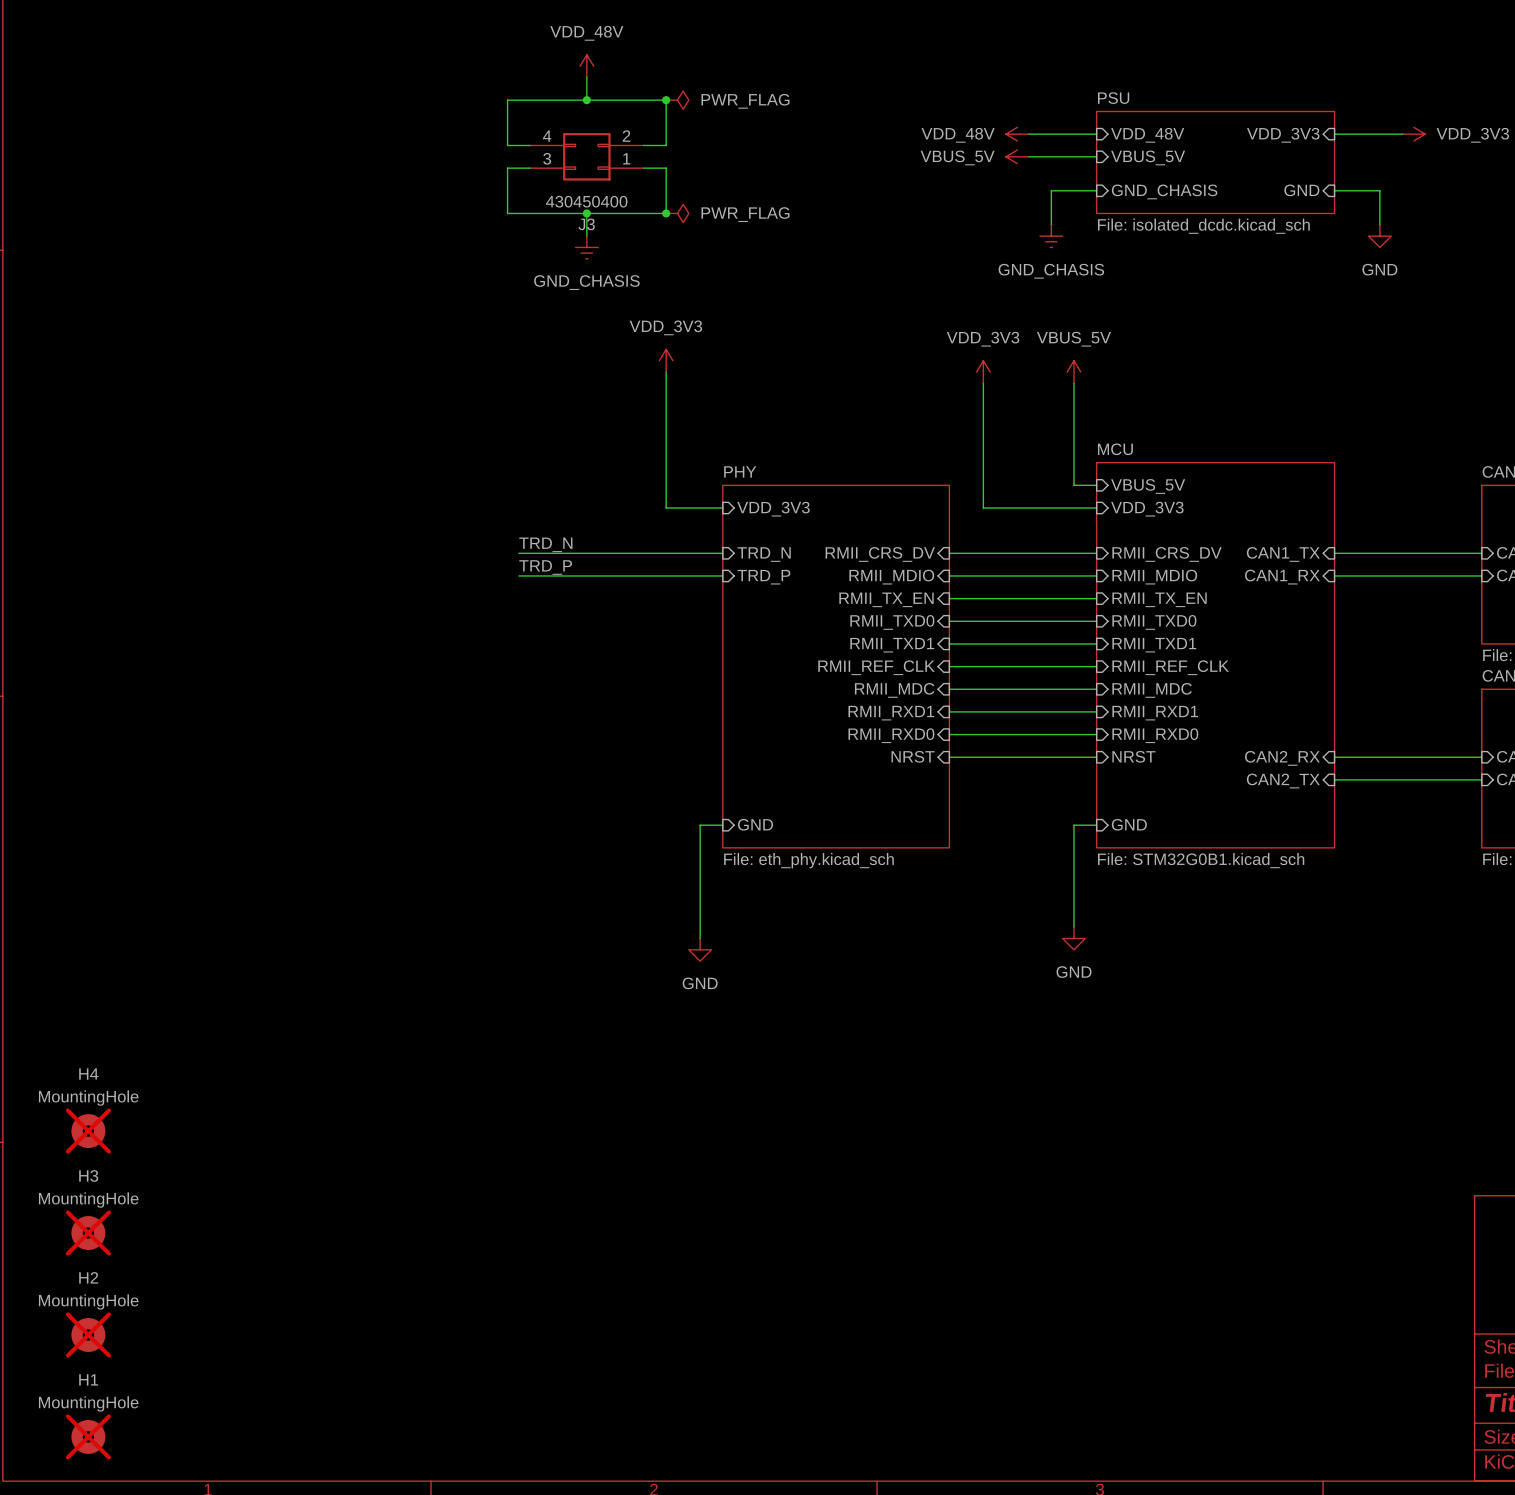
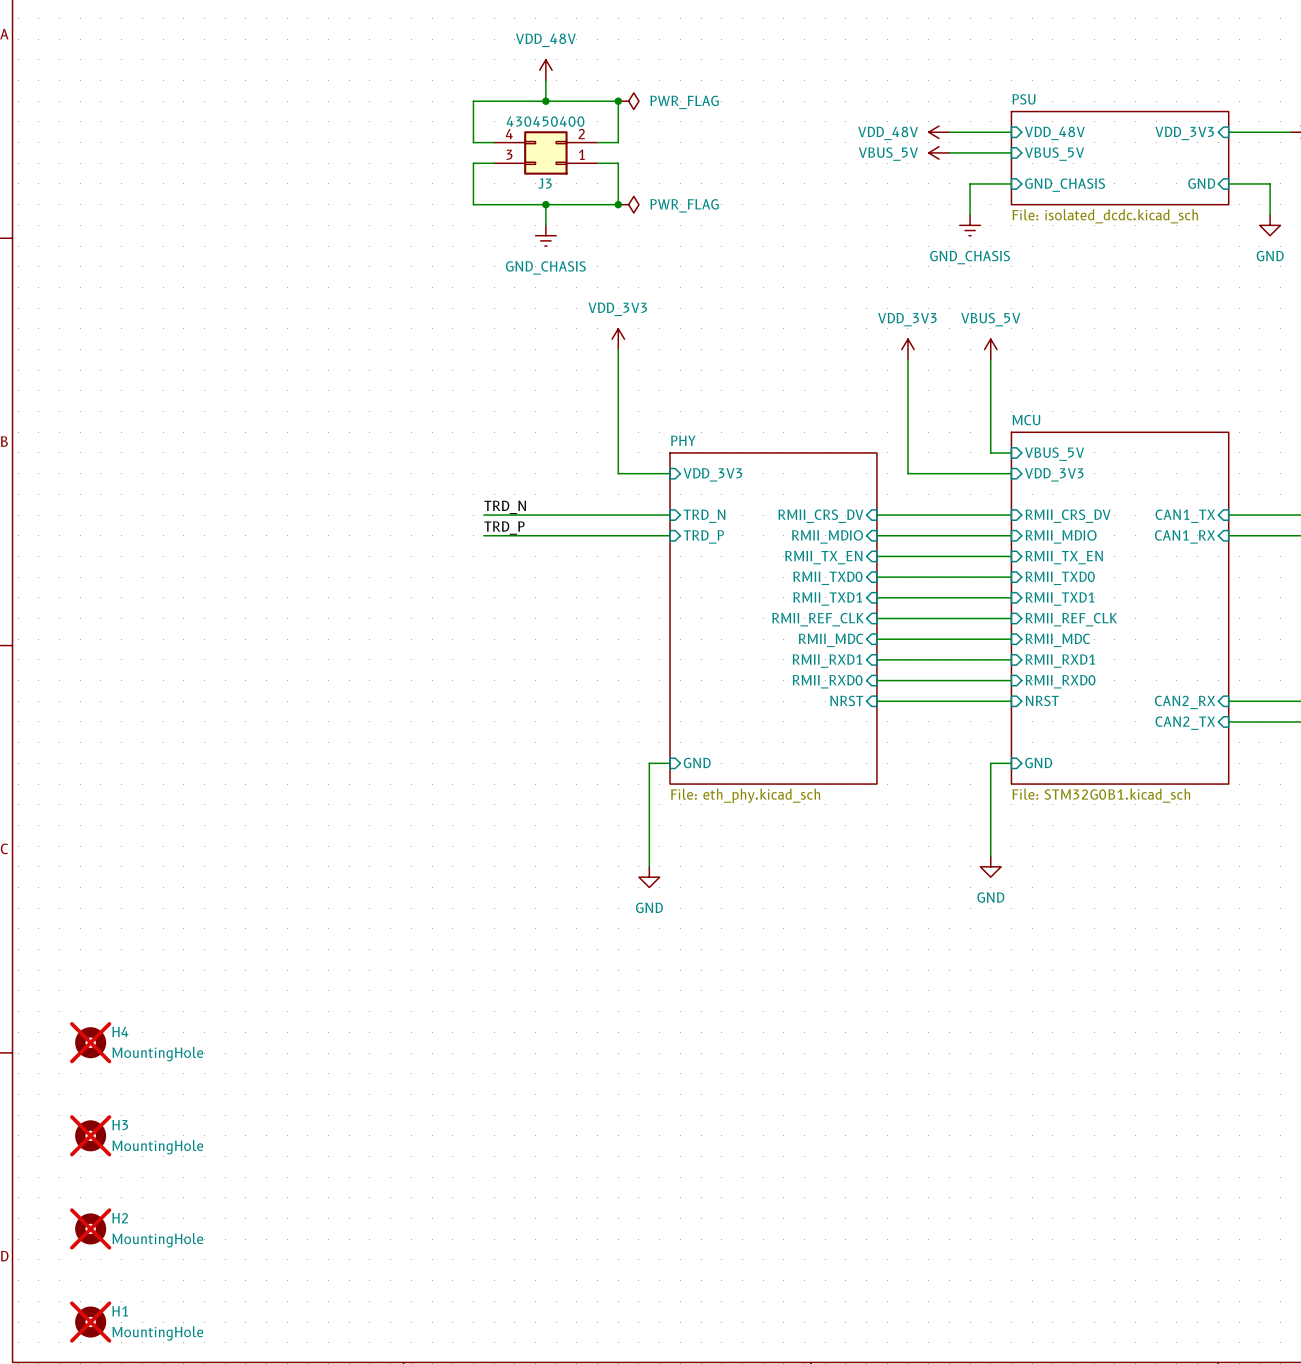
J3 value position: 430450400 (586, 201) -> 430450400 (545, 121)
J3 name position: J3 (586, 224) -> J3 (545, 183)
H4 name position: H4 (88, 1074) -> H4 (120, 1031)
H4 value position: MountingHole (88, 1098) -> MountingHole (157, 1054)
H3 name position: H3 (88, 1175) -> H3 (120, 1125)
H3 value position: MountingHole (88, 1200) -> MountingHole (157, 1147)
H2 name position: H2 (88, 1277) -> H2 (120, 1218)
H2 value position: MountingHole (88, 1301) -> MountingHole (157, 1240)
H1 name position: H1 (88, 1379) -> H1 (120, 1311)
H1 value position: MountingHole (88, 1403) -> MountingHole (157, 1333)

